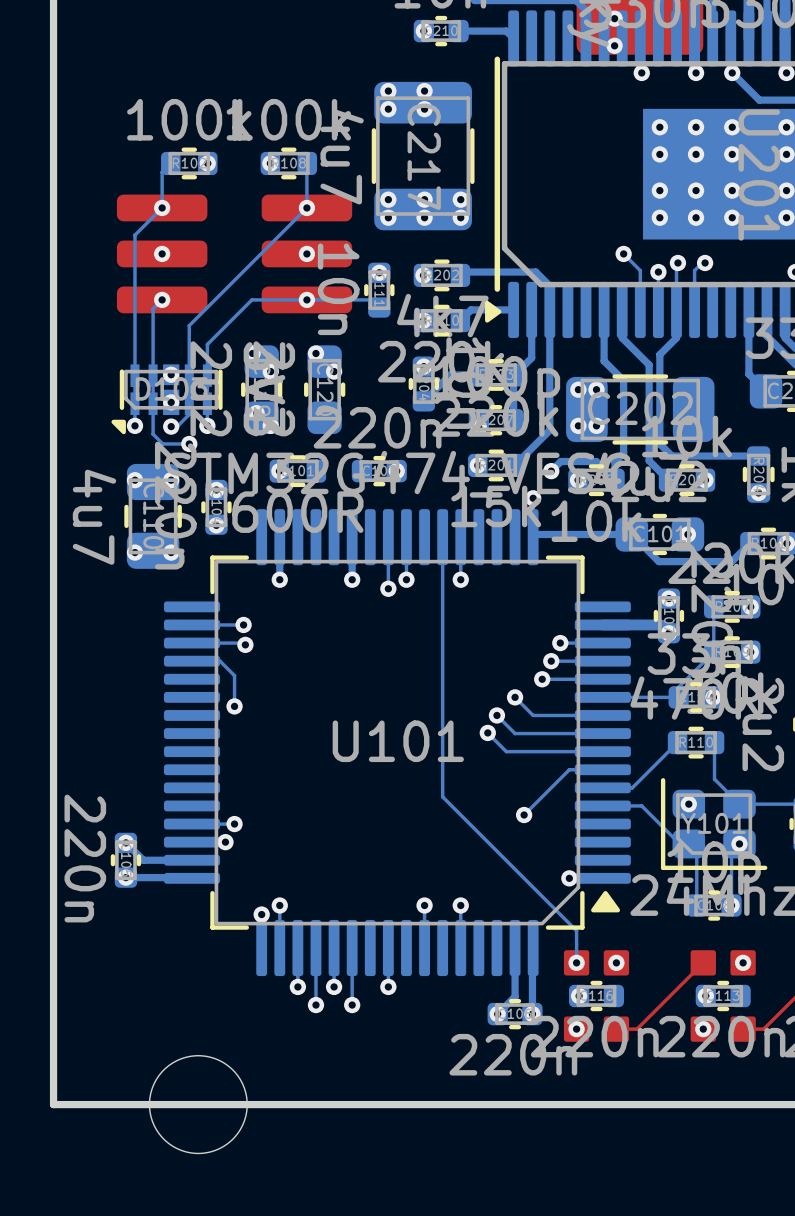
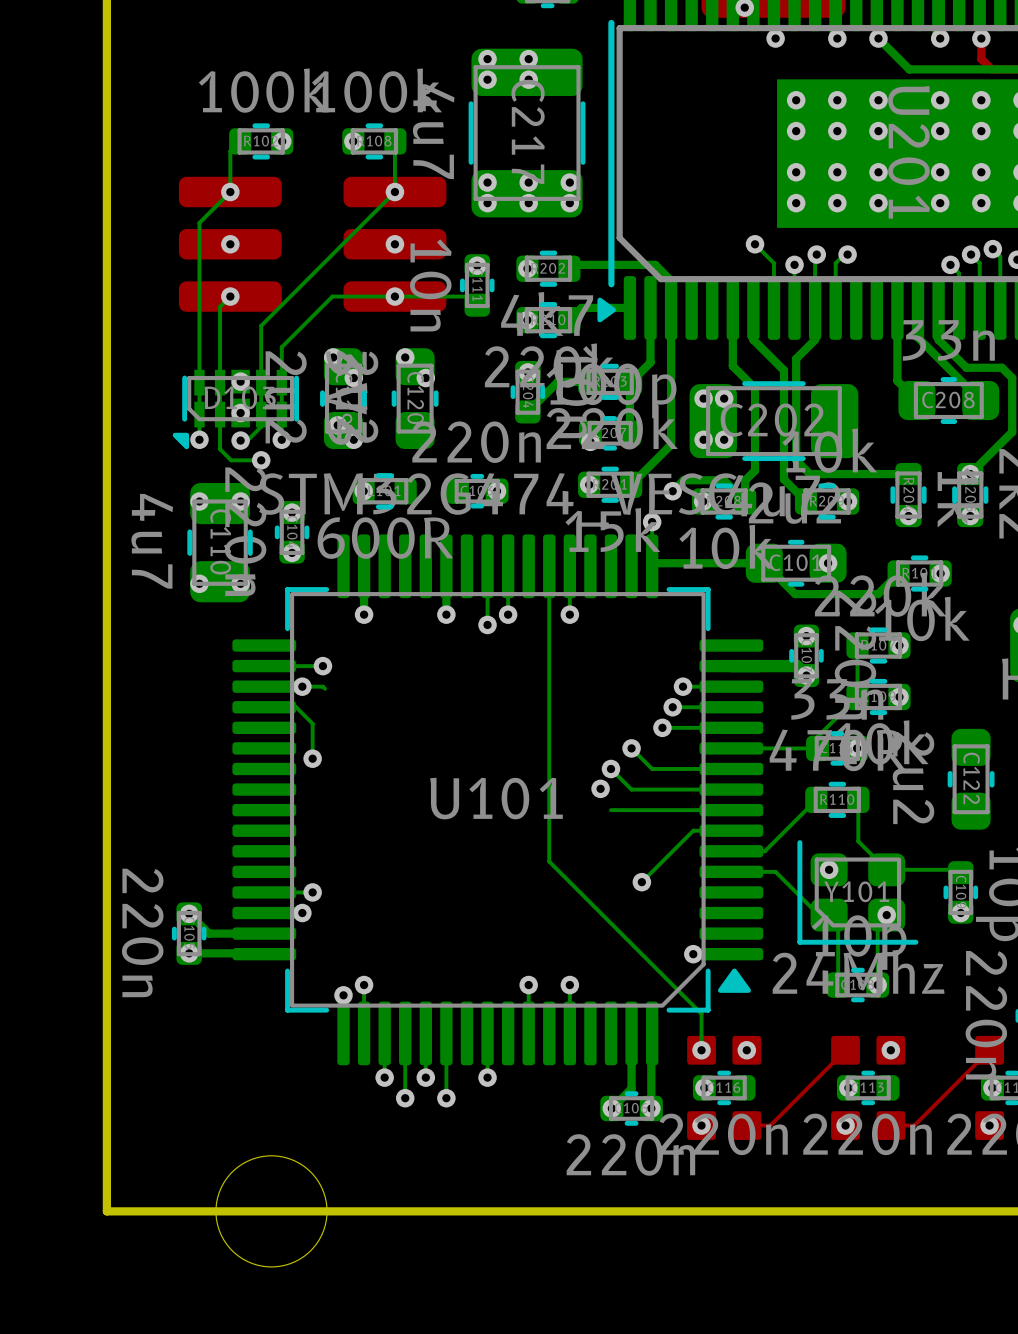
via position: (245, 644) -> (302, 686)
bottom track: (487, 733) (506, 751) -> (611, 810) (621, 810)

